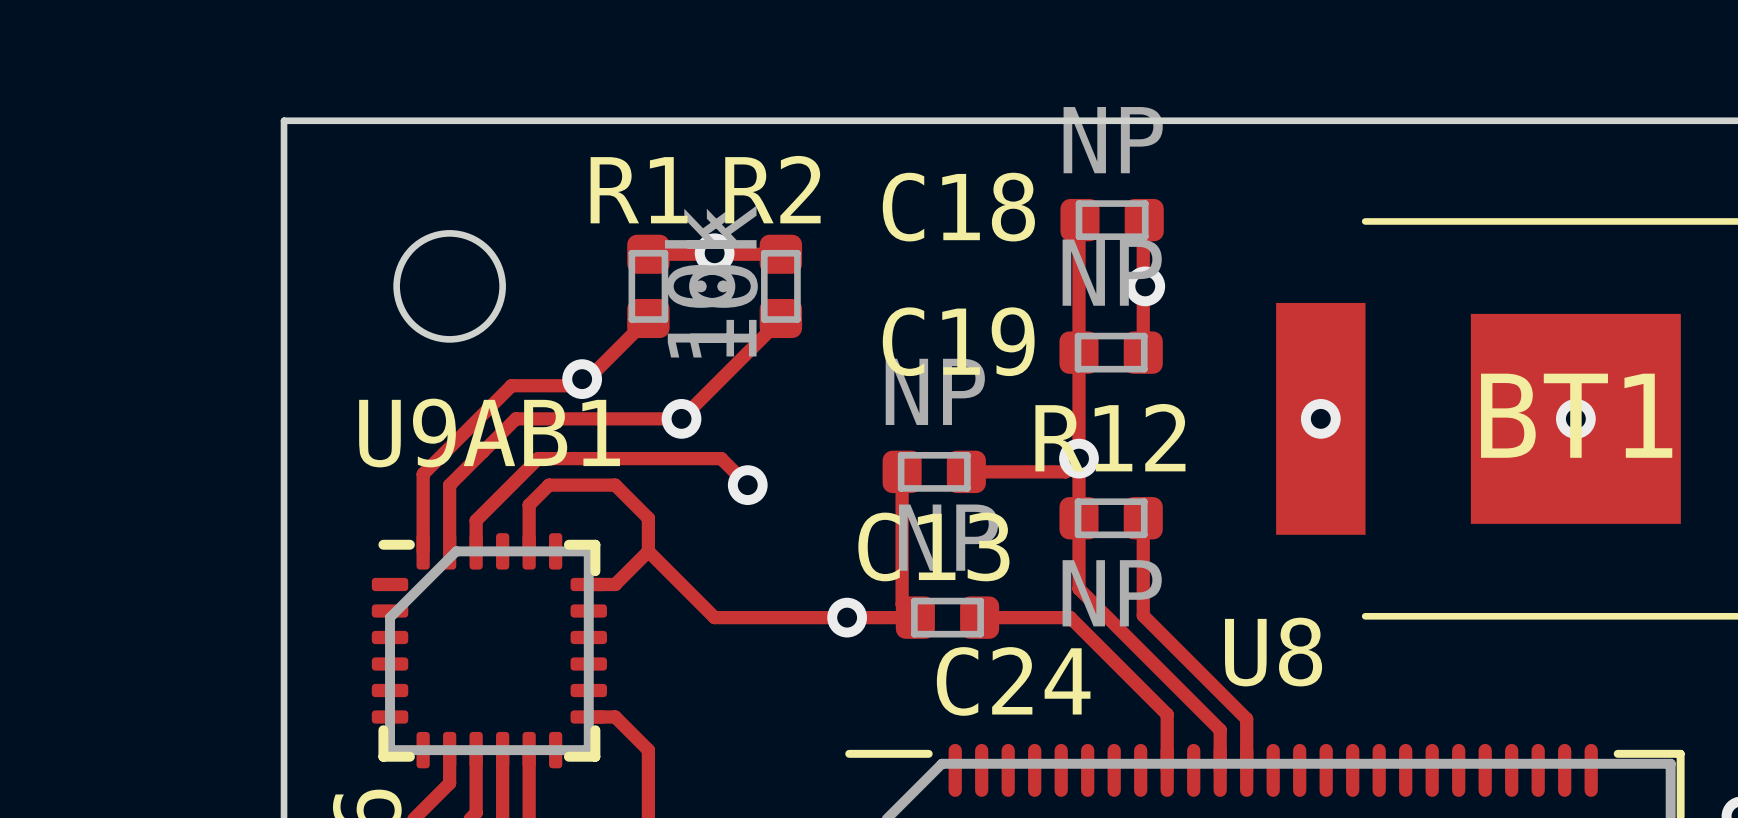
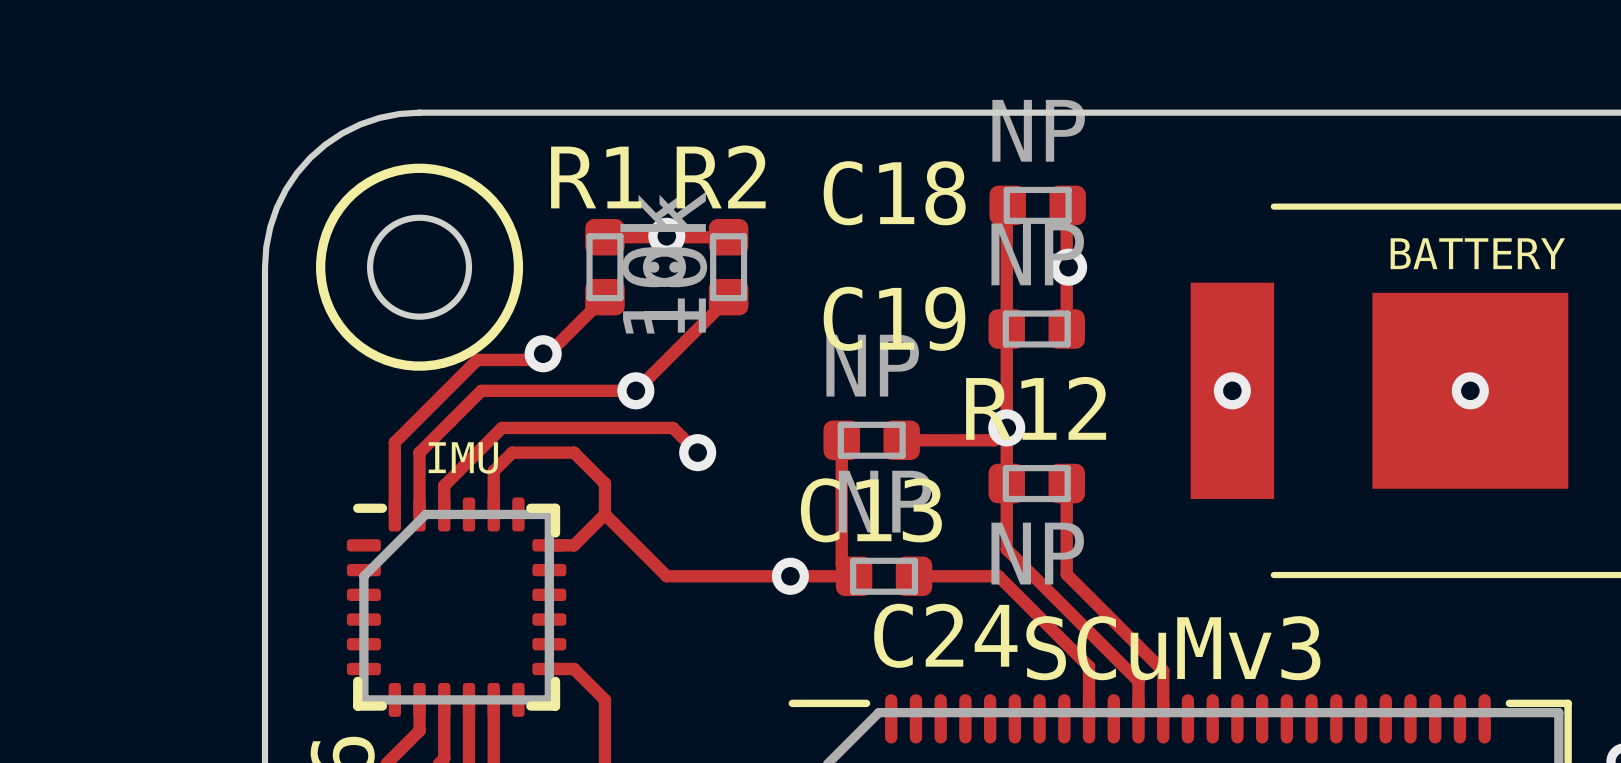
board edge: (449, 120) (284, 120) (284, 286) -> (419, 112) (399, 113) (360, 124) (325, 144) (310, 157) (296, 173) (276, 208) (266, 247) (265, 267)
drawing: none -> [316, 163, 524, 371]
BT1 name: BT1 (1576, 415) -> BATTERY (1477, 253)
U9AB1 name: U9AB1 (489, 433) -> IMU (463, 457)
U8 name: U8 (1273, 652) -> SCuMv3 (1173, 648)

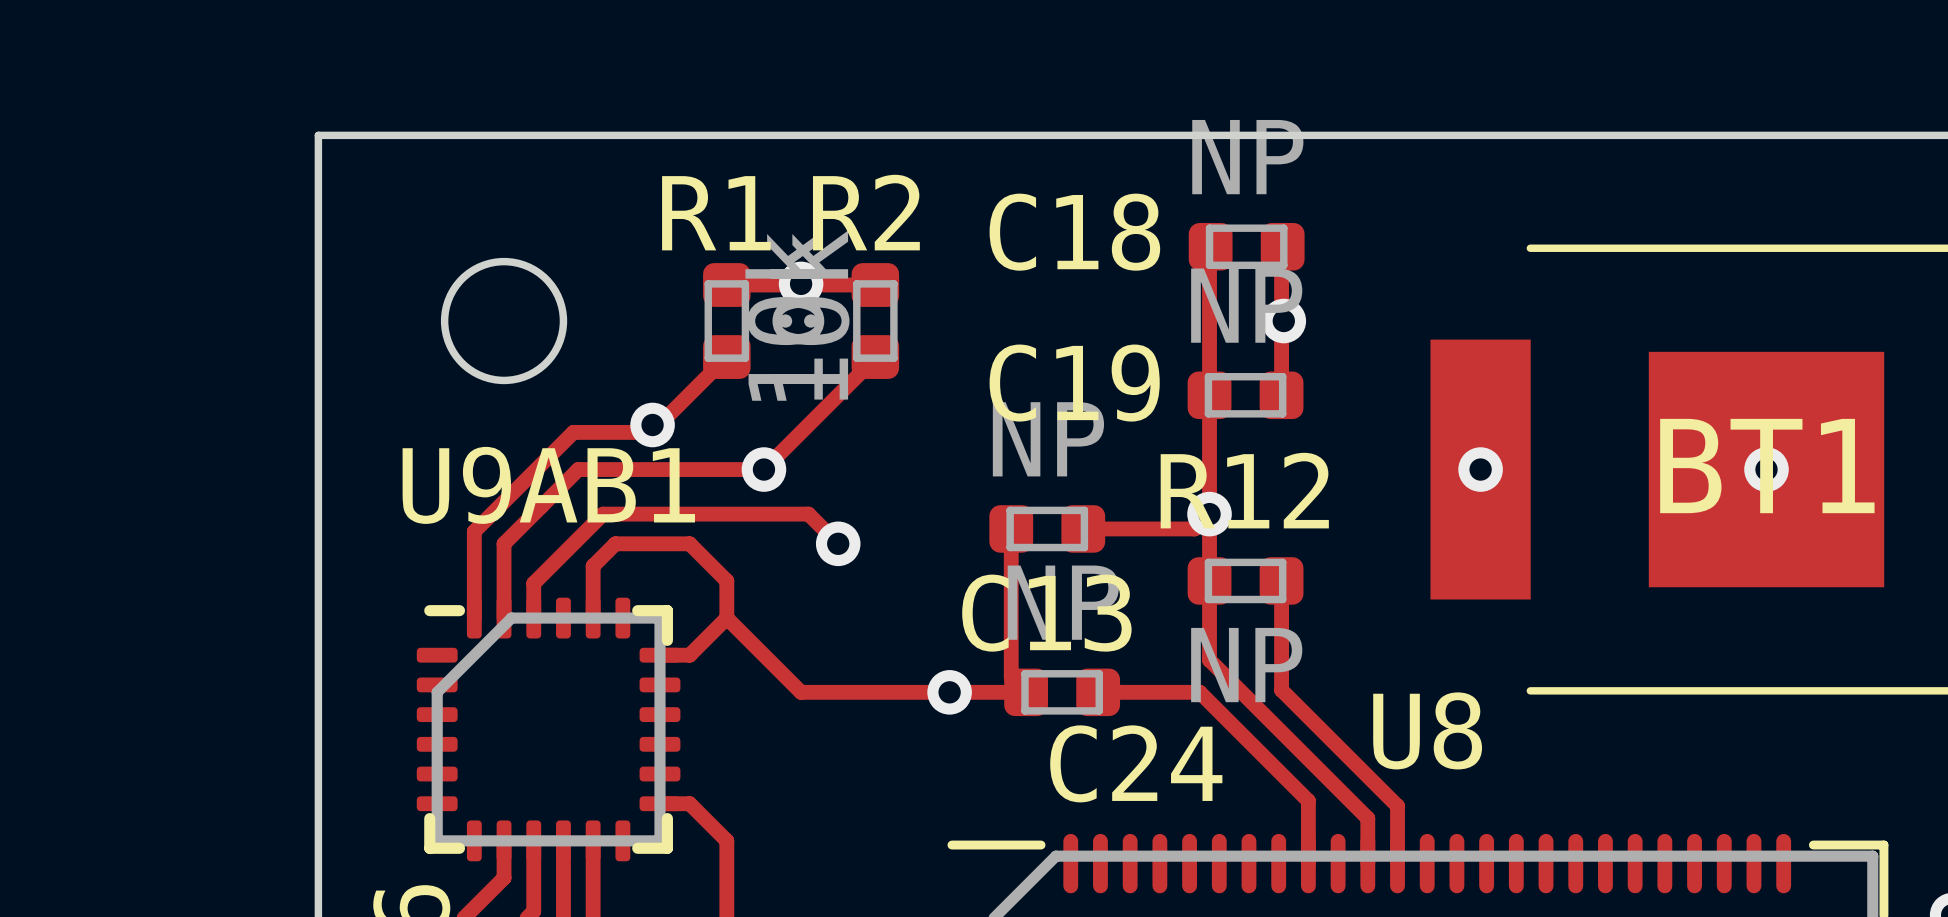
board edge: (419, 112) (399, 113) (360, 124) (325, 144) (310, 157) (296, 173) (276, 208) (266, 247) (265, 267) -> (504, 135) (318, 135) (318, 321)
drawing: [316, 163, 524, 371] -> none
BATTERY name: BATTERY (1477, 253) -> BT1 (1767, 466)
IMU name: IMU (463, 457) -> U9AB1 (548, 485)
SCuMv3 name: SCuMv3 (1173, 648) -> U8 (1427, 730)

